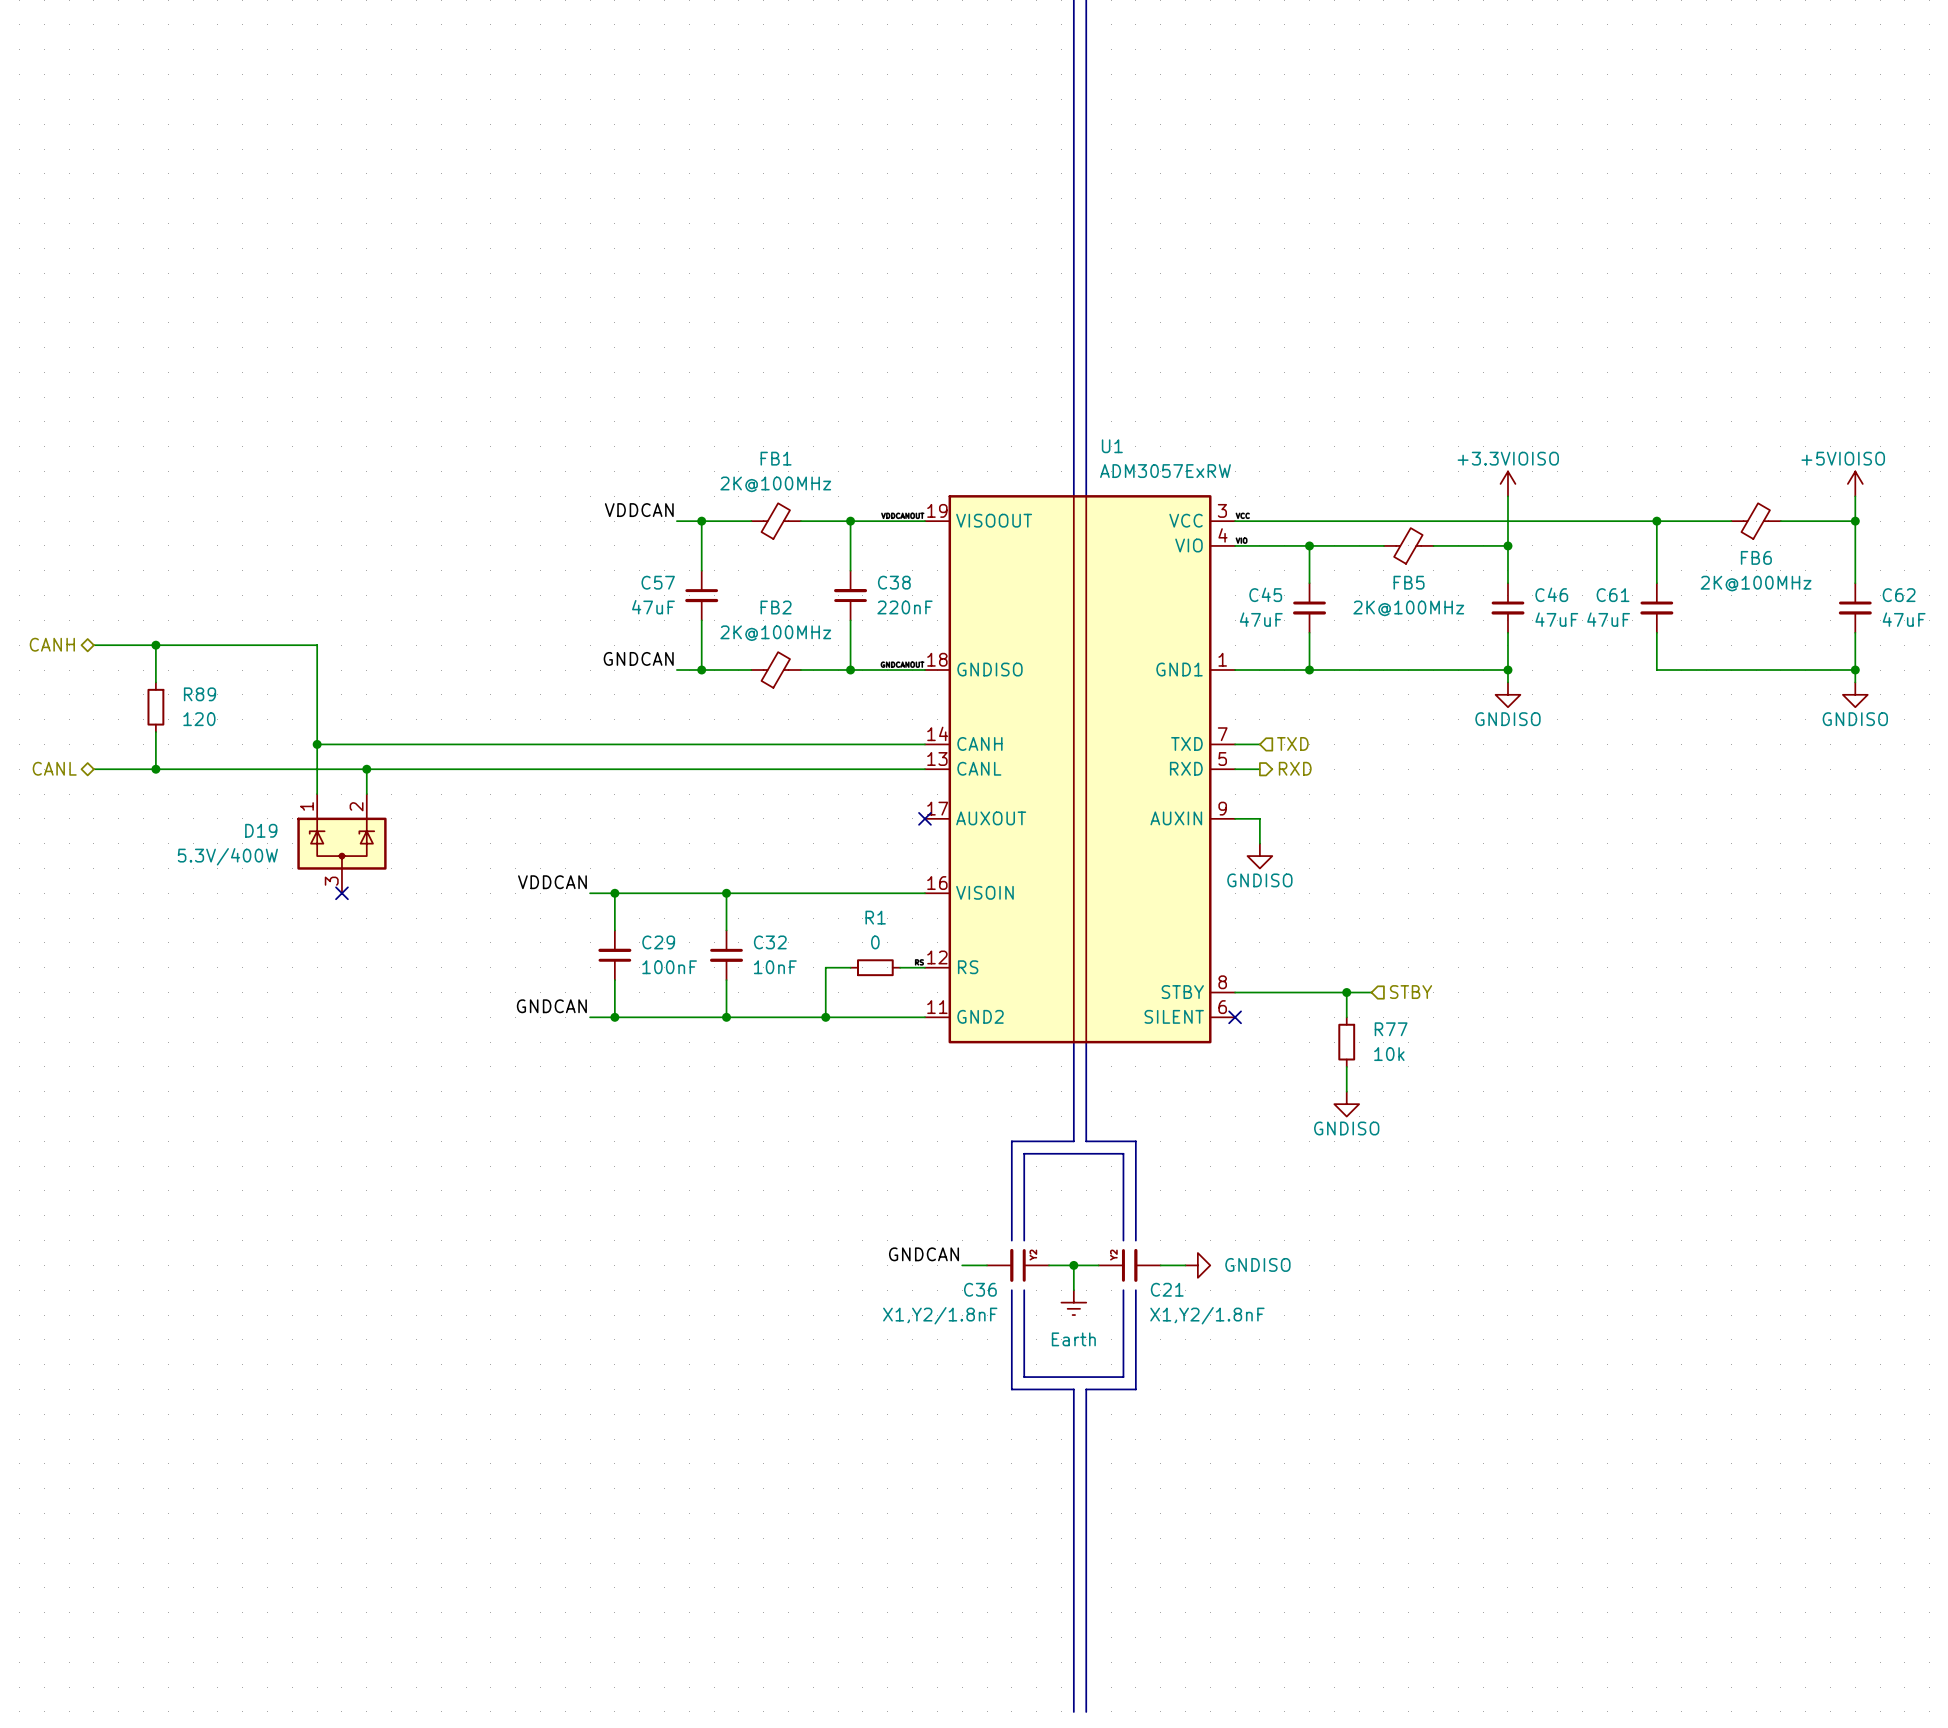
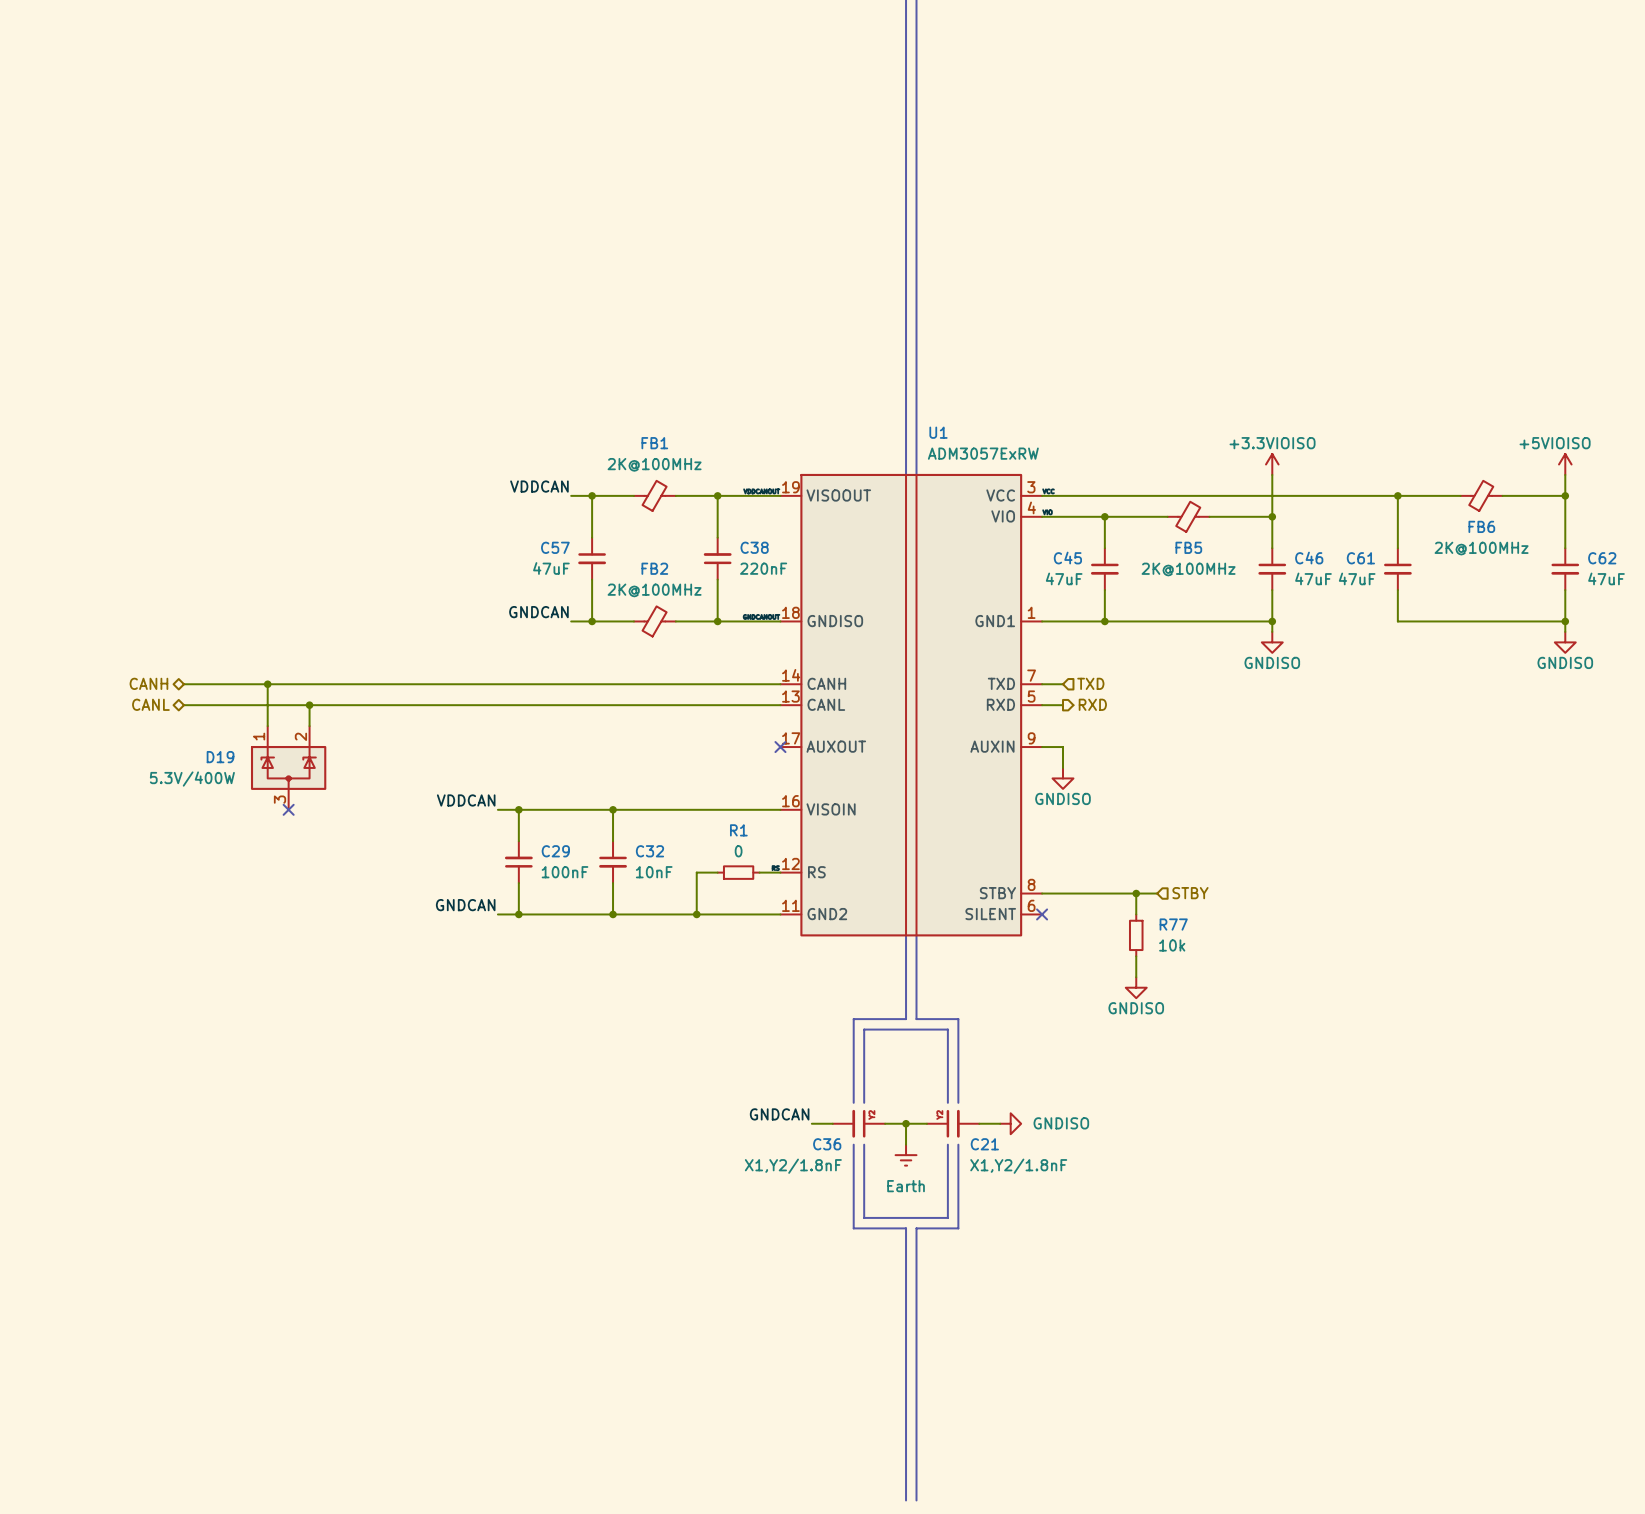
hierarchical label position: CANH (52, 644) -> CANH (148, 683)
wire: (93, 645) (317, 645) (317, 744) -> (183, 684) (267, 684)
wire: (155, 645) (155, 682) -> none
junction: (155, 645) -> none
R89: 120 (155, 707) -> none
wire: (155, 732) (155, 769) -> none
hierarchical label position: CANL (54, 768) -> CANL (150, 704)
wire: (93, 769) (217, 769) -> none
junction: (155, 769) -> none

